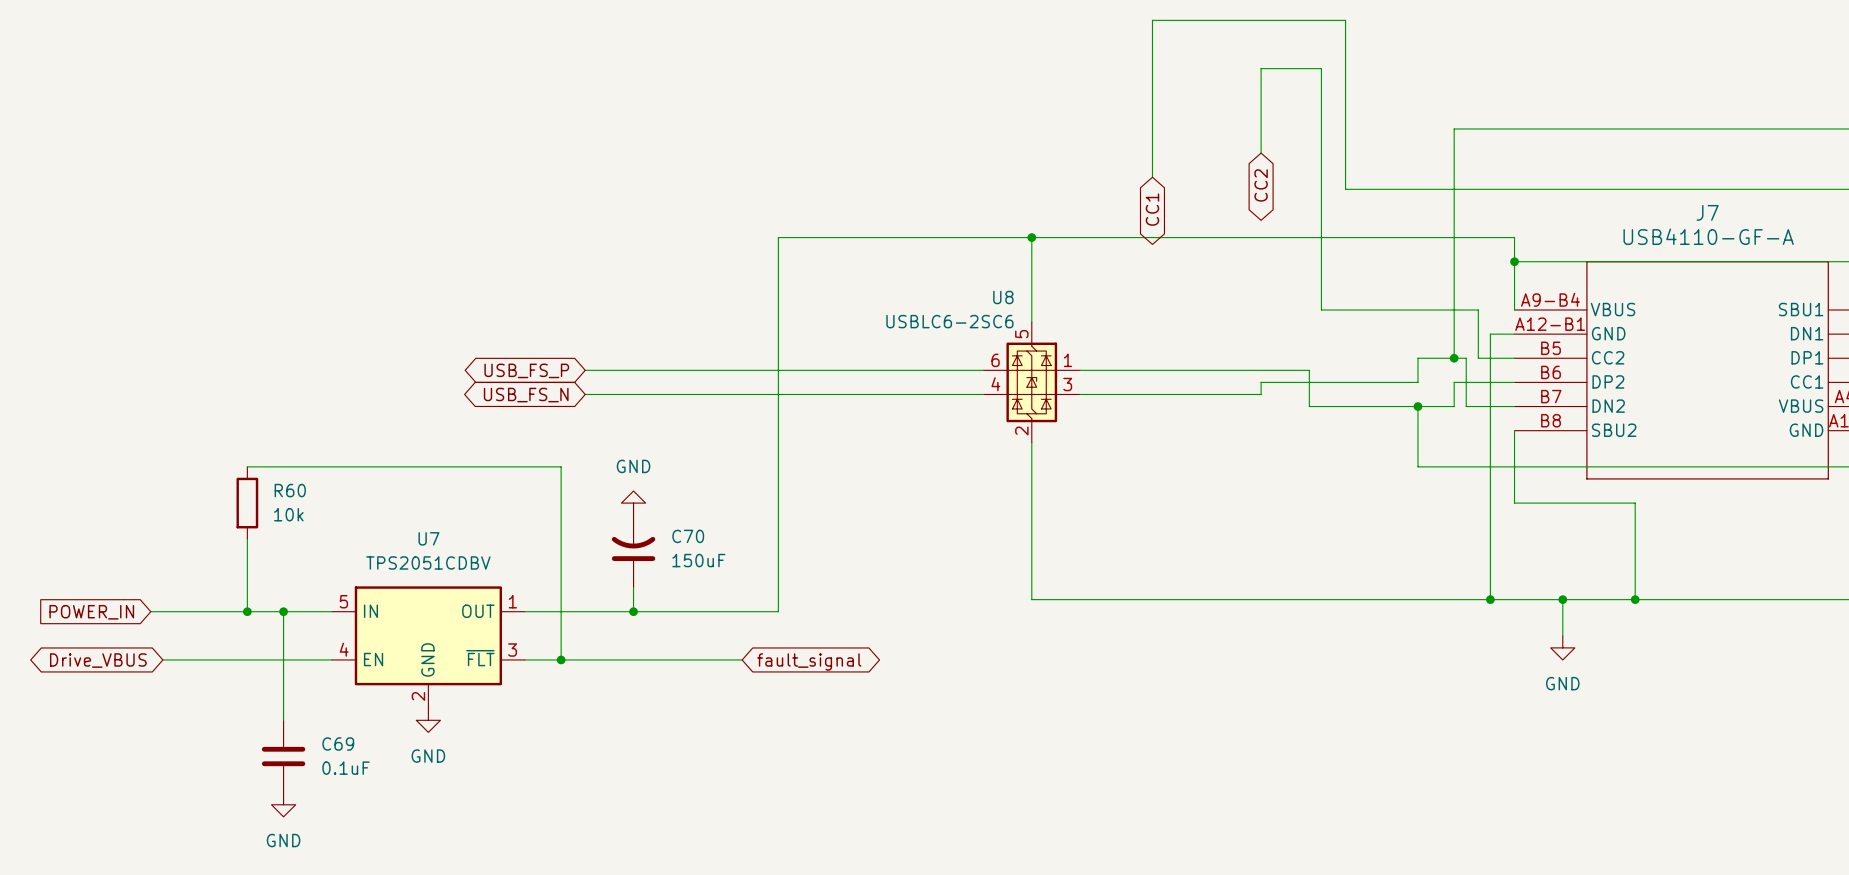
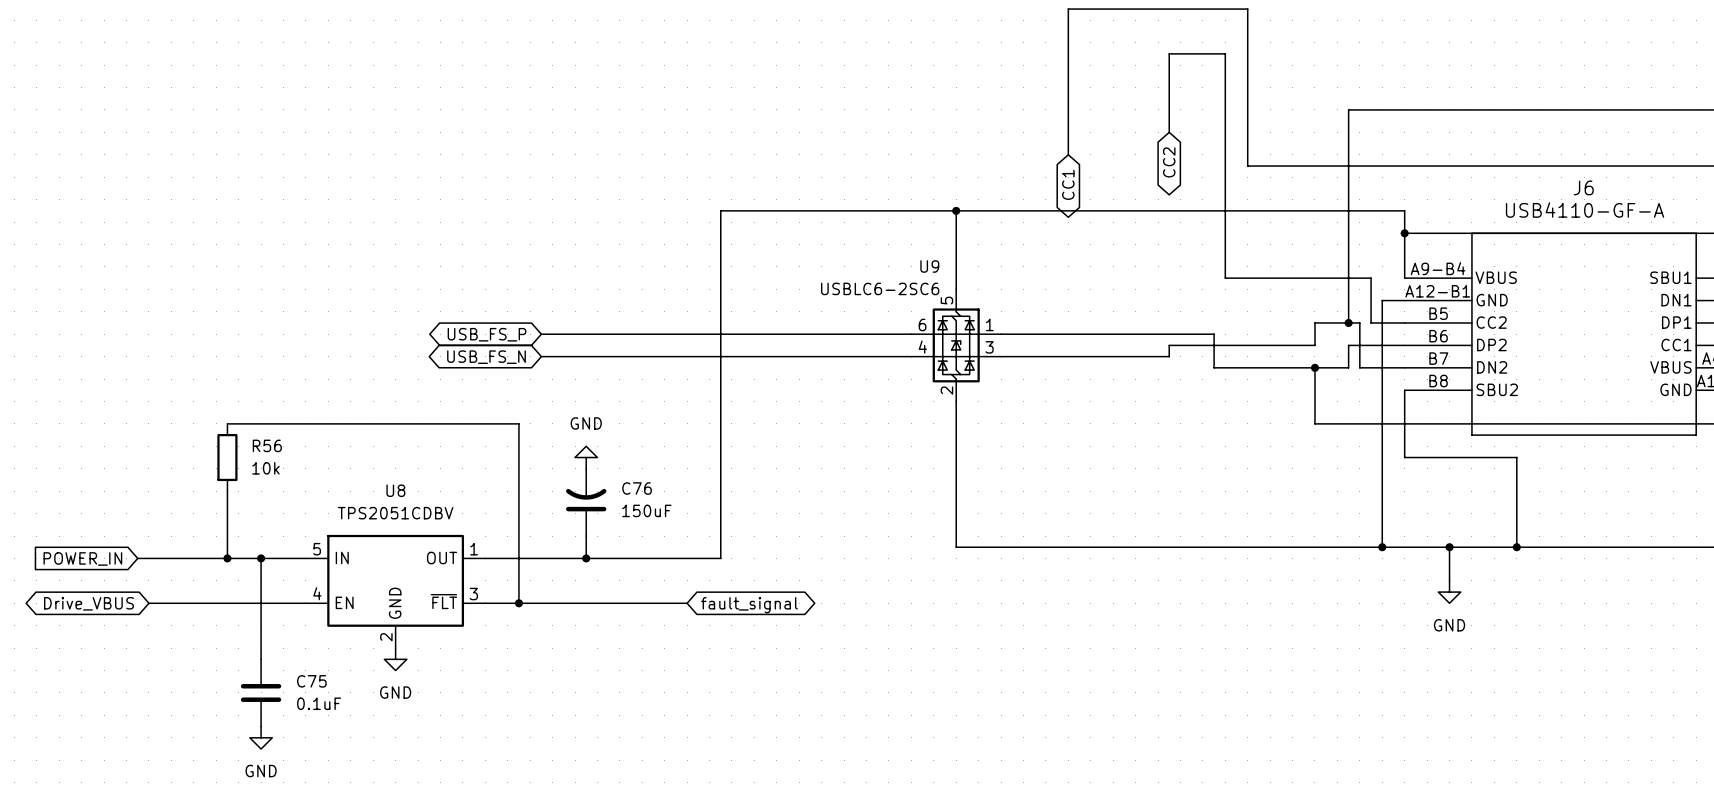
J7 name: J7 (1707, 212) -> J6 (1583, 187)
U8 name: U8 (1003, 297) -> U9 (929, 266)
R60 name: R60 (290, 490) -> R56 (267, 445)
C70 name: C70 (688, 536) -> C76 (637, 488)
U7 name: U7 (428, 538) -> U8 (395, 490)
C69 name: C69 (338, 743) -> C75 (311, 681)

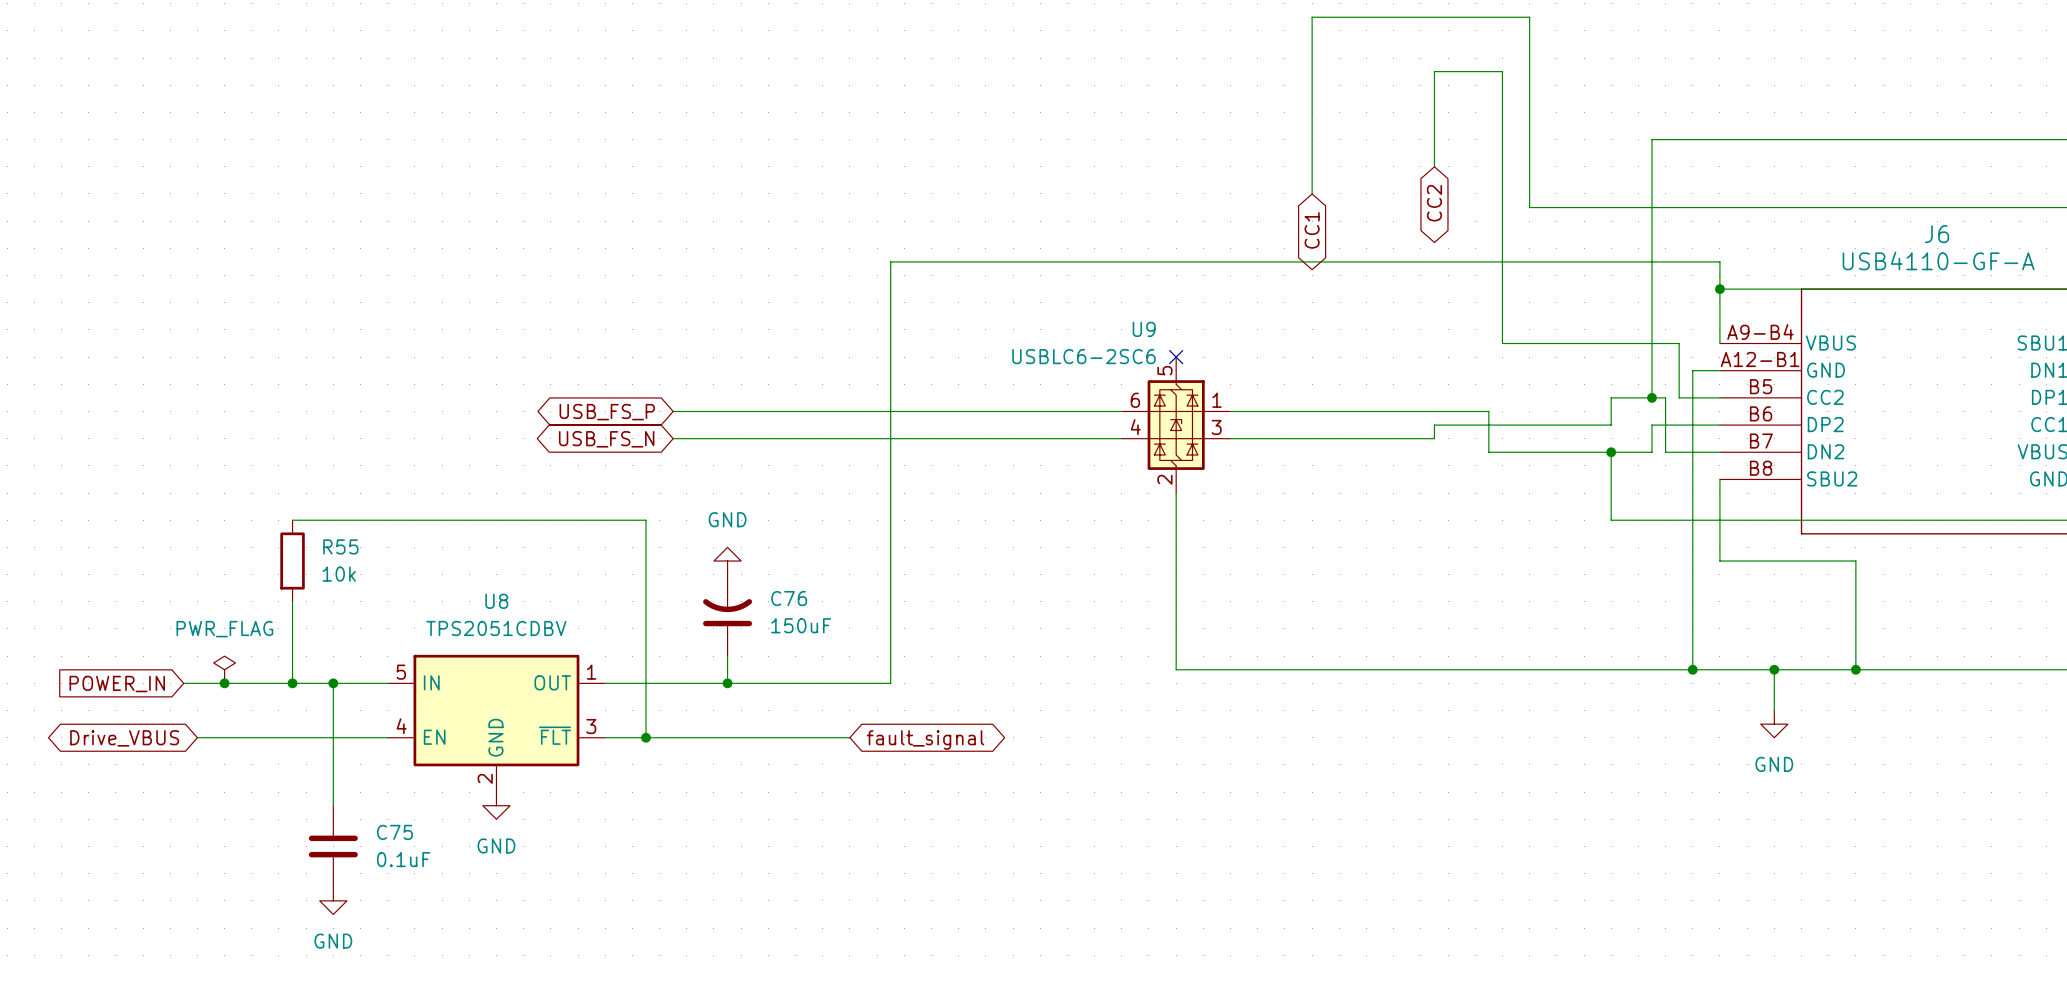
wire: (956, 210) (956, 289) -> none
junction: (956, 210) -> none
no-connect mark: none -> (1176, 357)
R56 name: R56 (267, 445) -> R55 (340, 546)
power symbol: none -> PWR_FLAG (224, 669)
junction: none -> (224, 683)

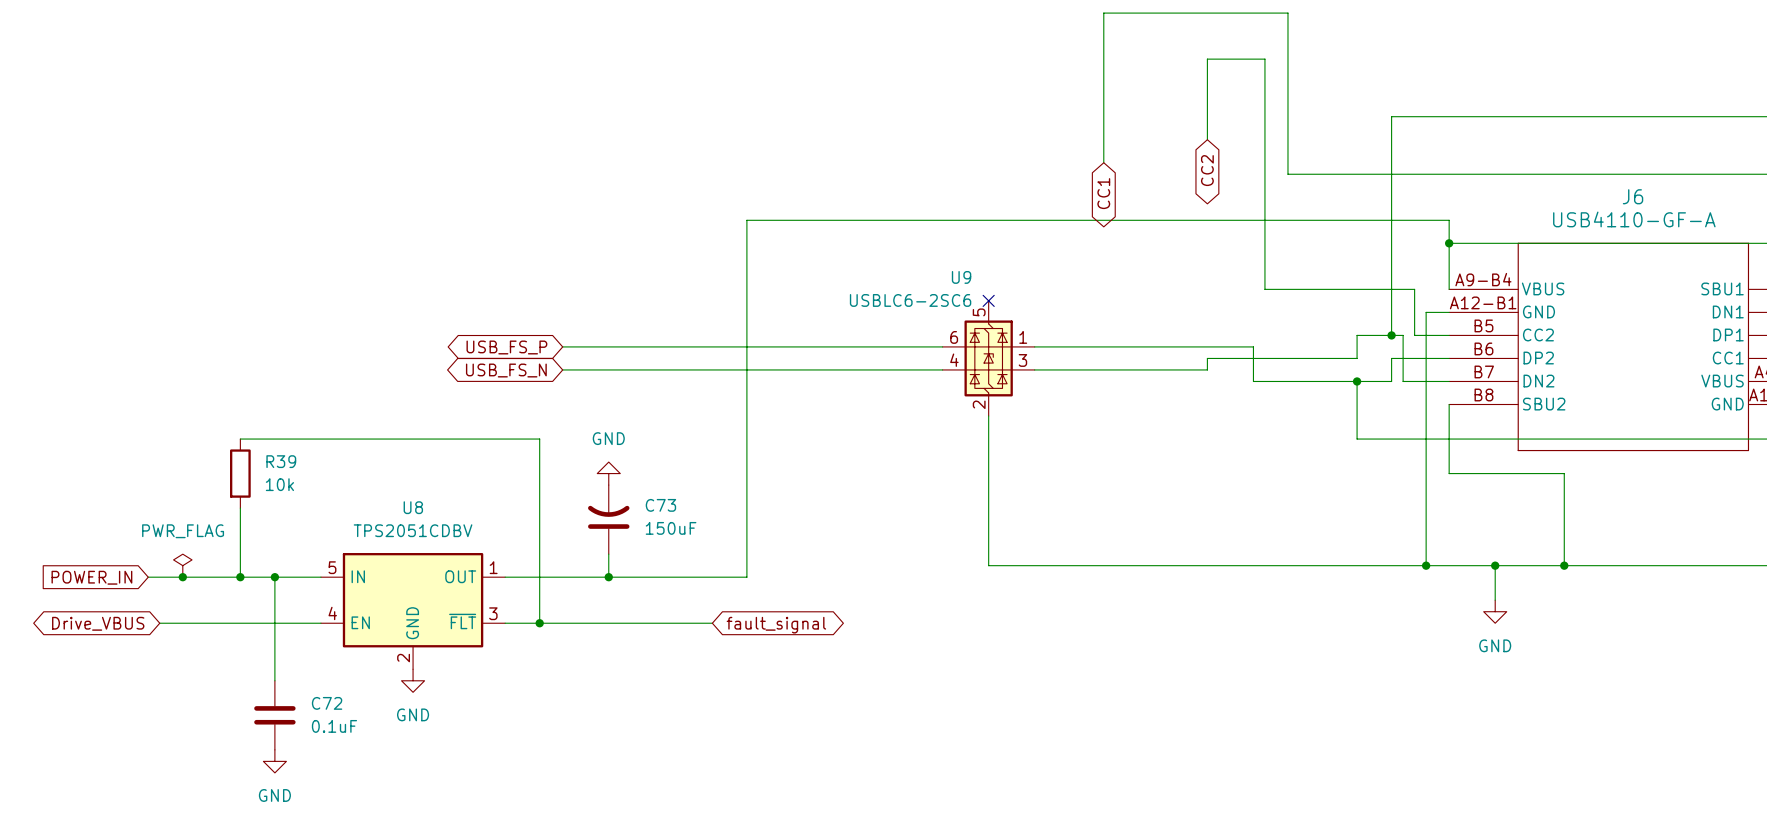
R55 name: R55 (340, 546) -> R39 (281, 461)
C76 name: C76 (789, 598) -> C73 (660, 505)
C75 name: C75 (394, 832) -> C72 (327, 703)

